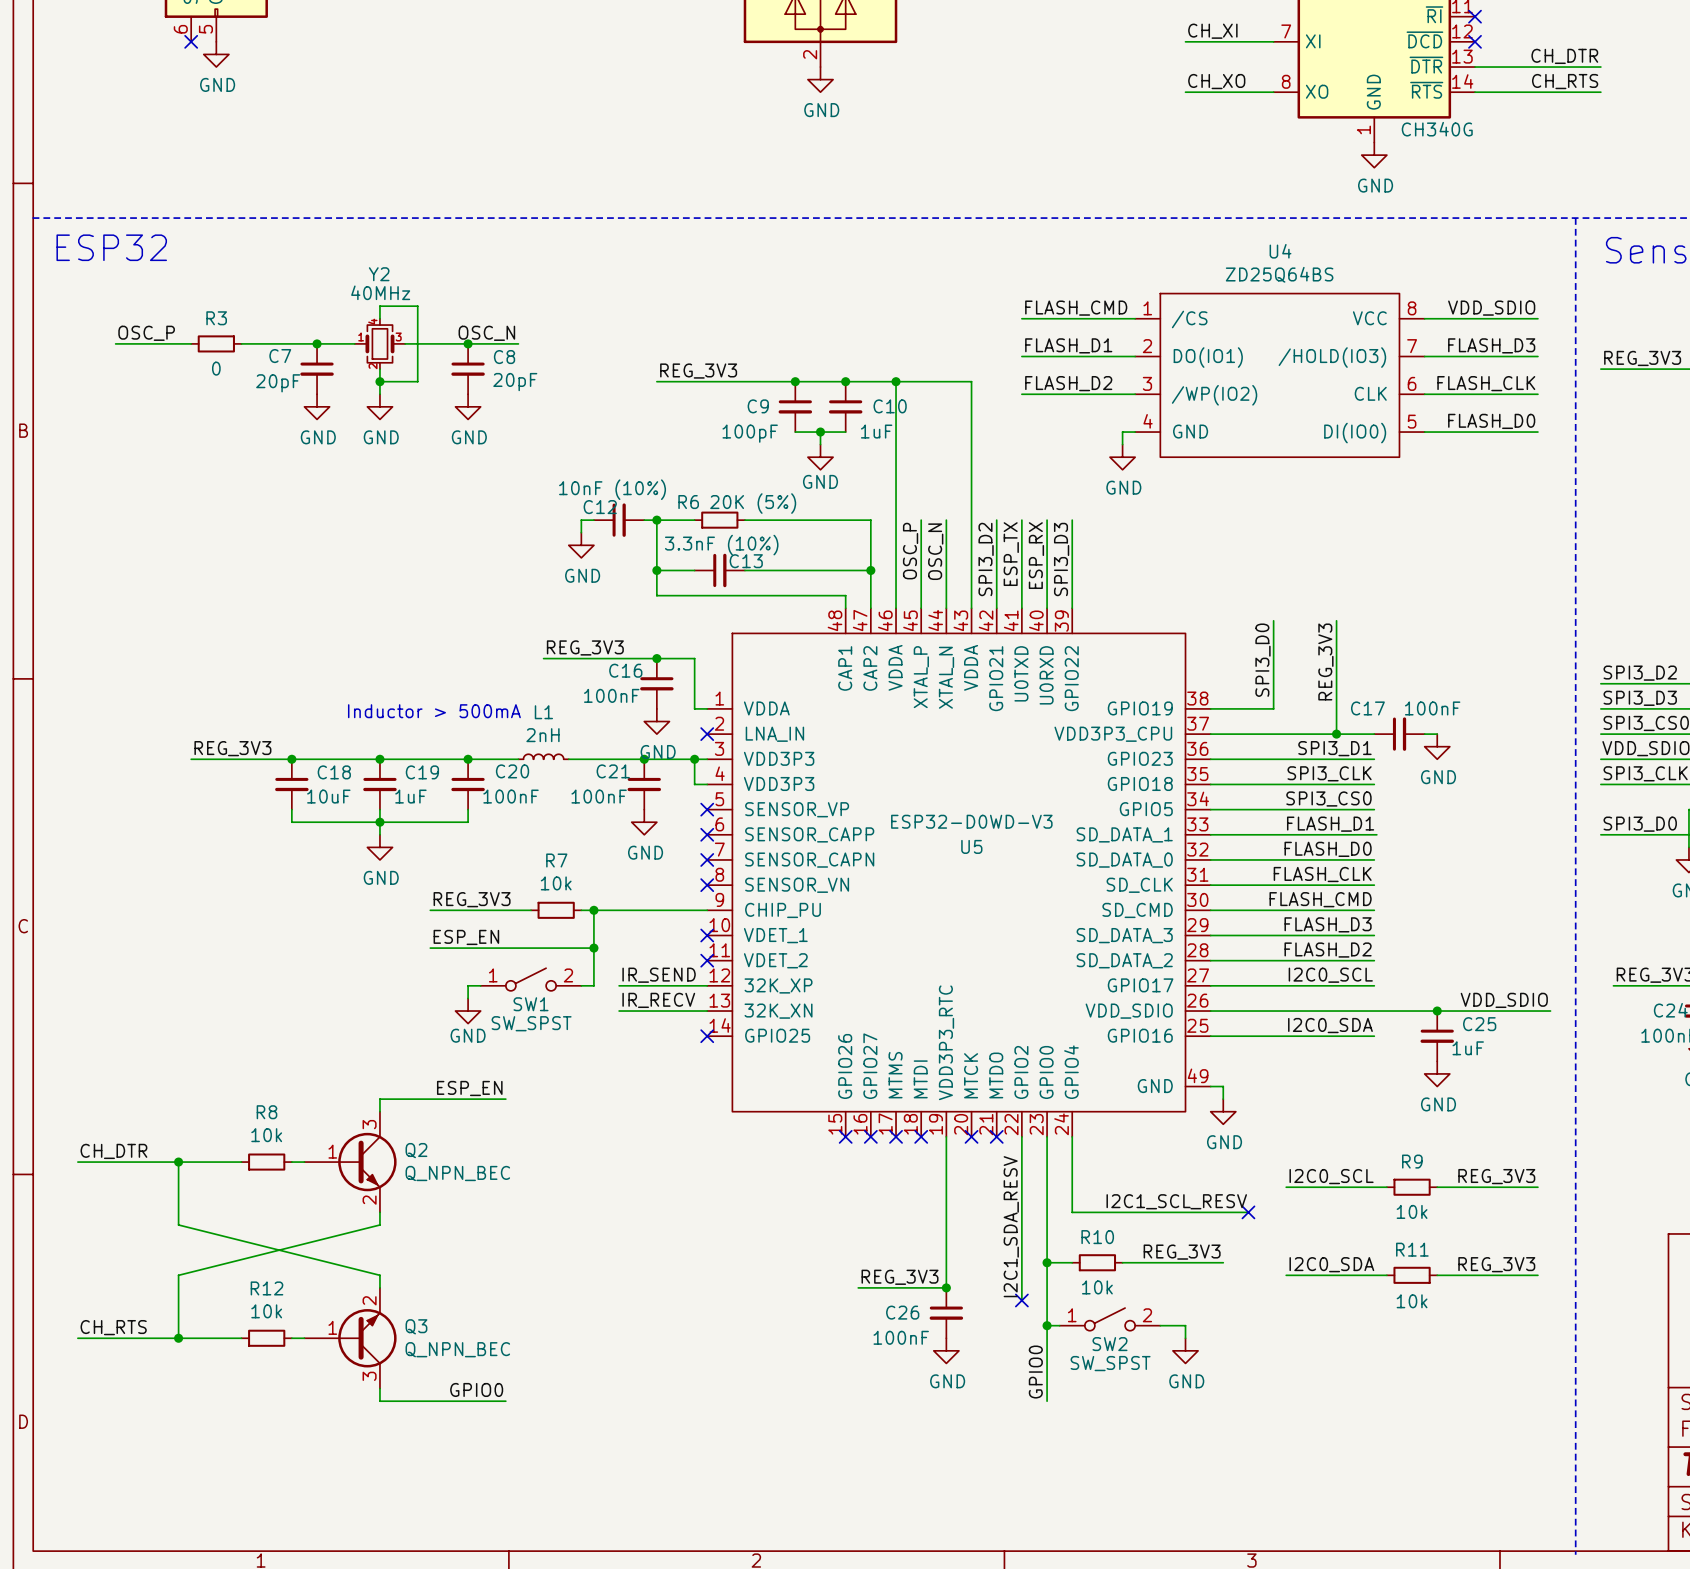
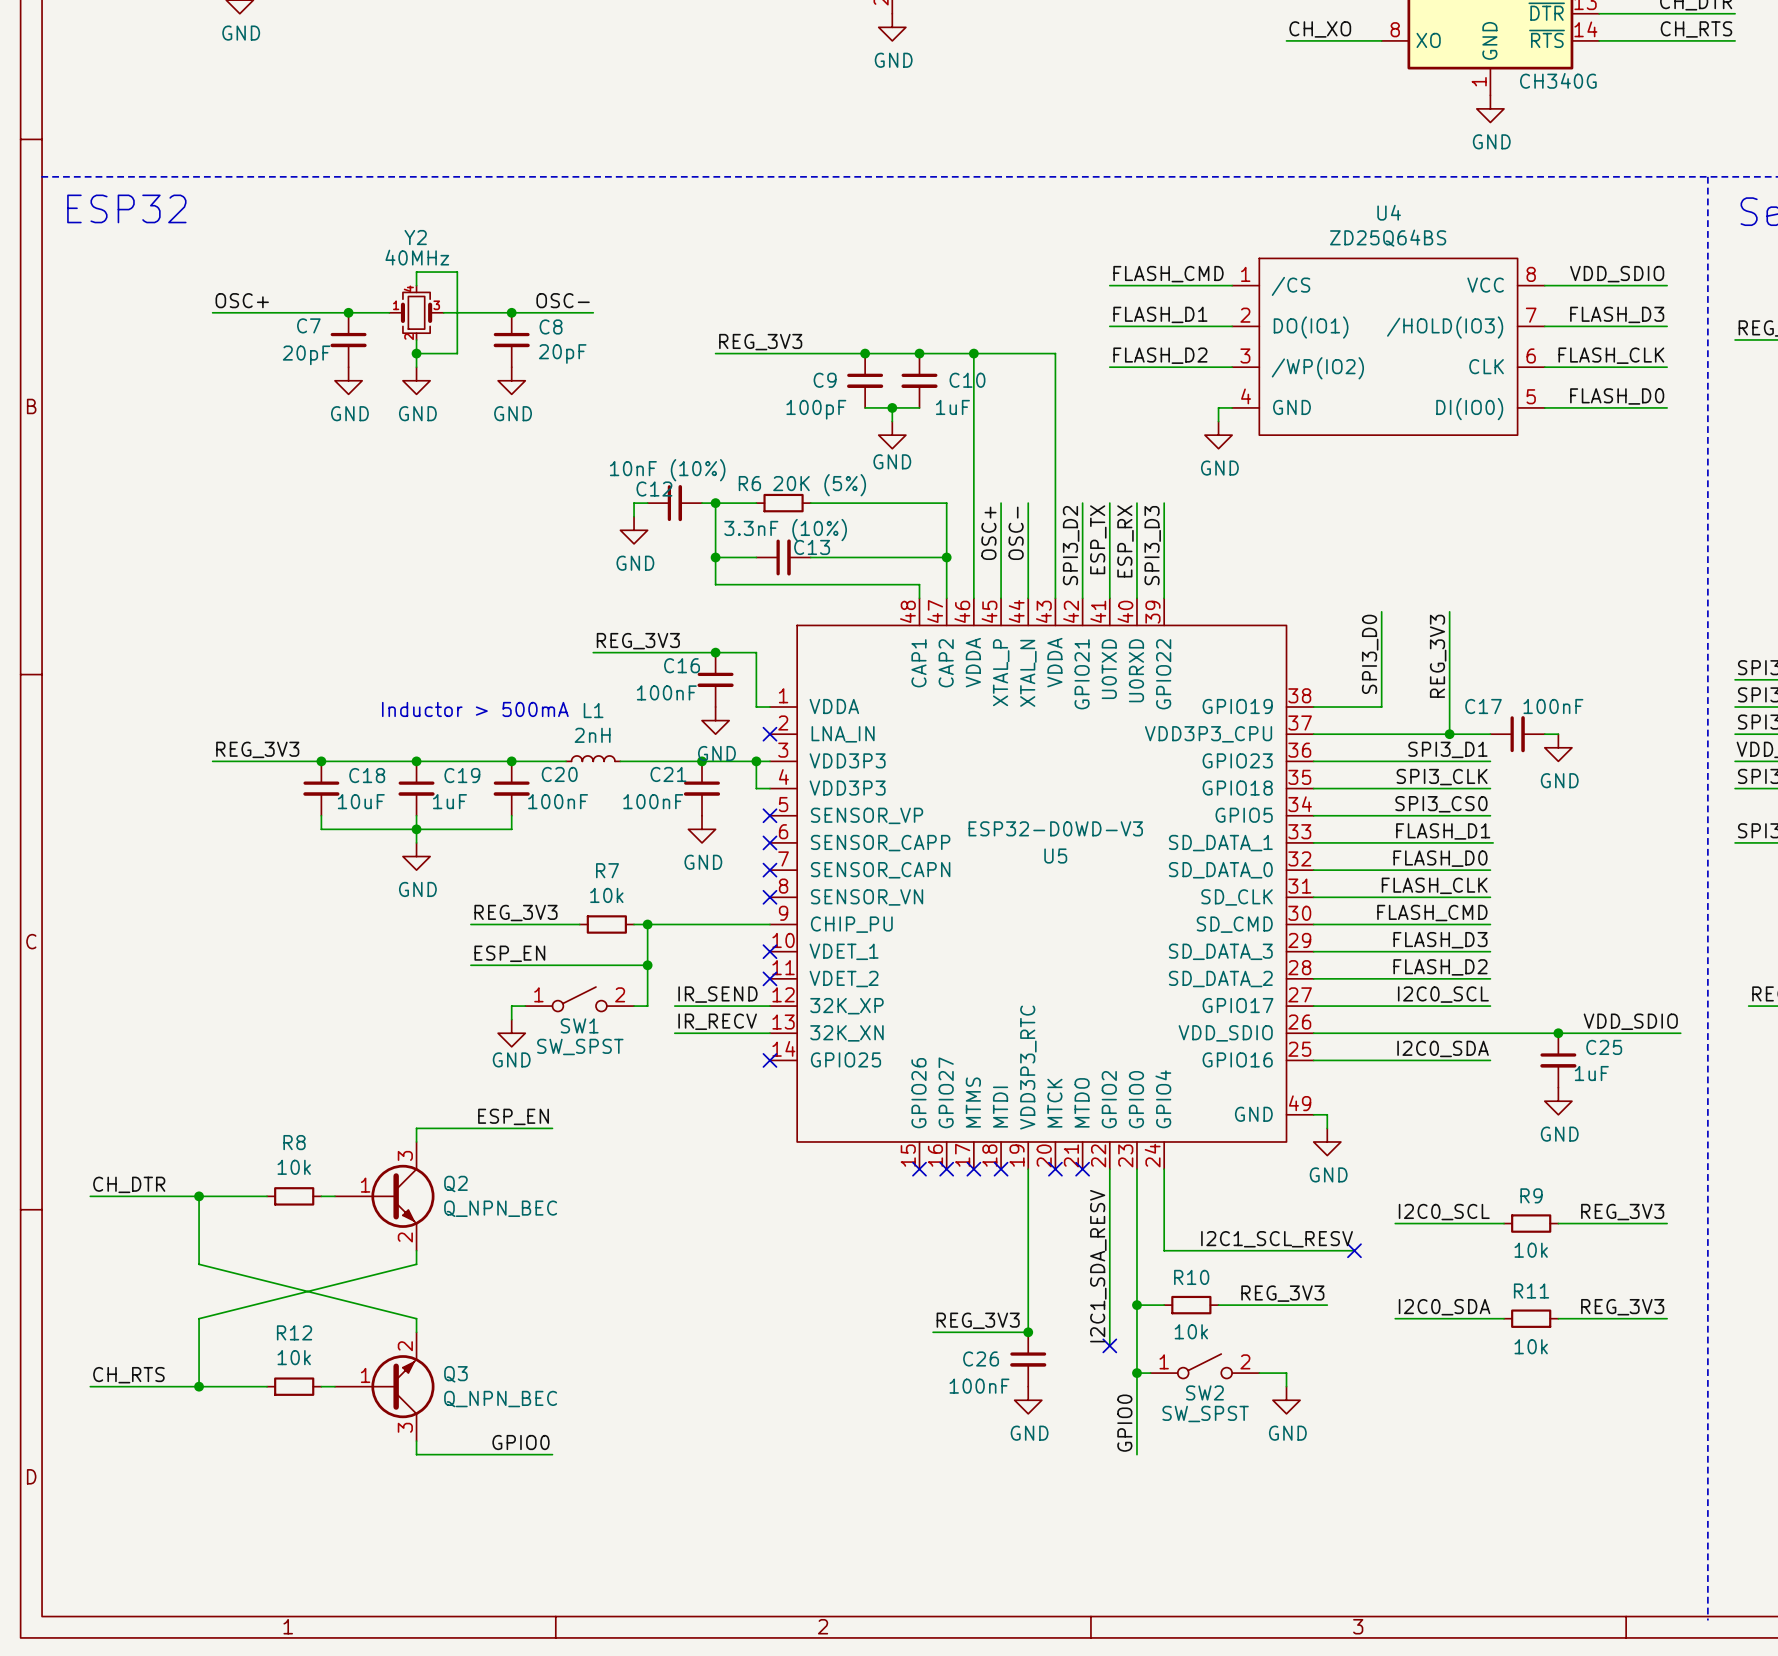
label: none -> OSC+ (242, 300)
label: OSC_P (146, 333) -> none
label: OSC_N (486, 333) -> OSC- (563, 300)
wire: (115, 343) (191, 343) -> (267, 312) (212, 312)
R3: 0 (216, 343) -> none
wire: none -> (566, 312) (593, 312)
label: OSC_P (910, 551) -> OSC+ (988, 533)
label: OSC_N (935, 551) -> OSC- (1016, 533)

